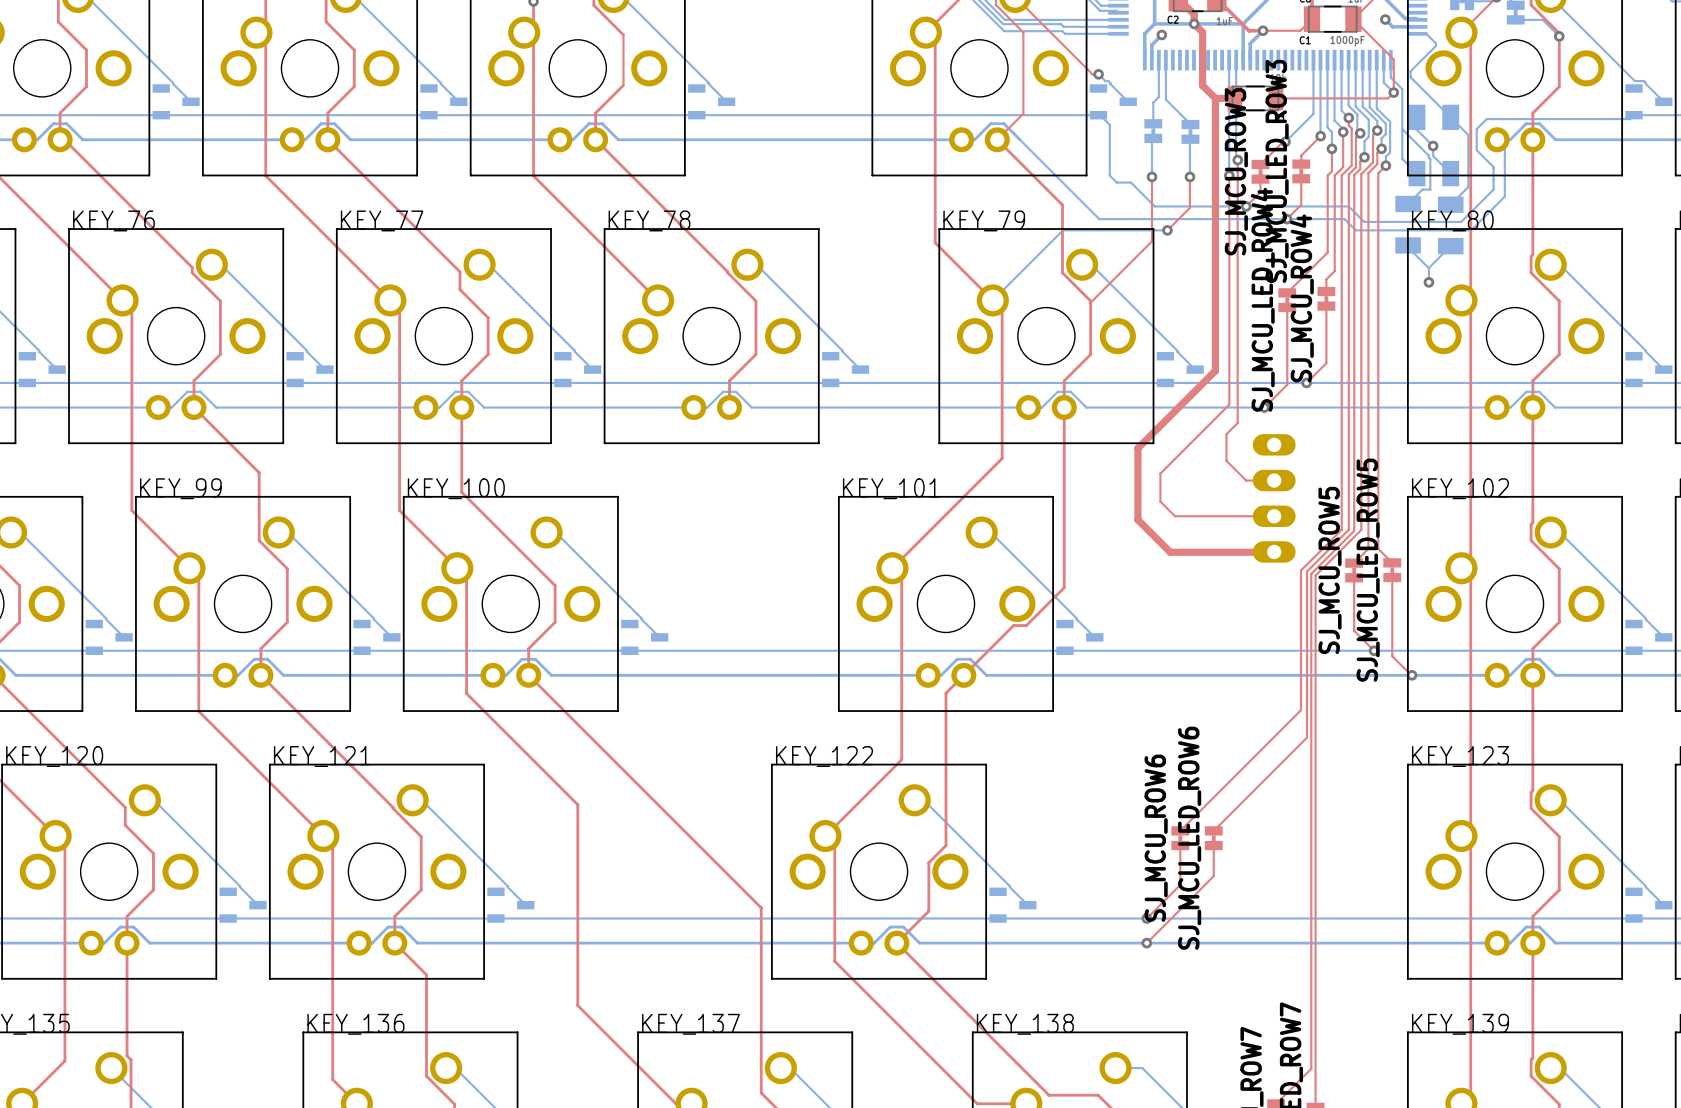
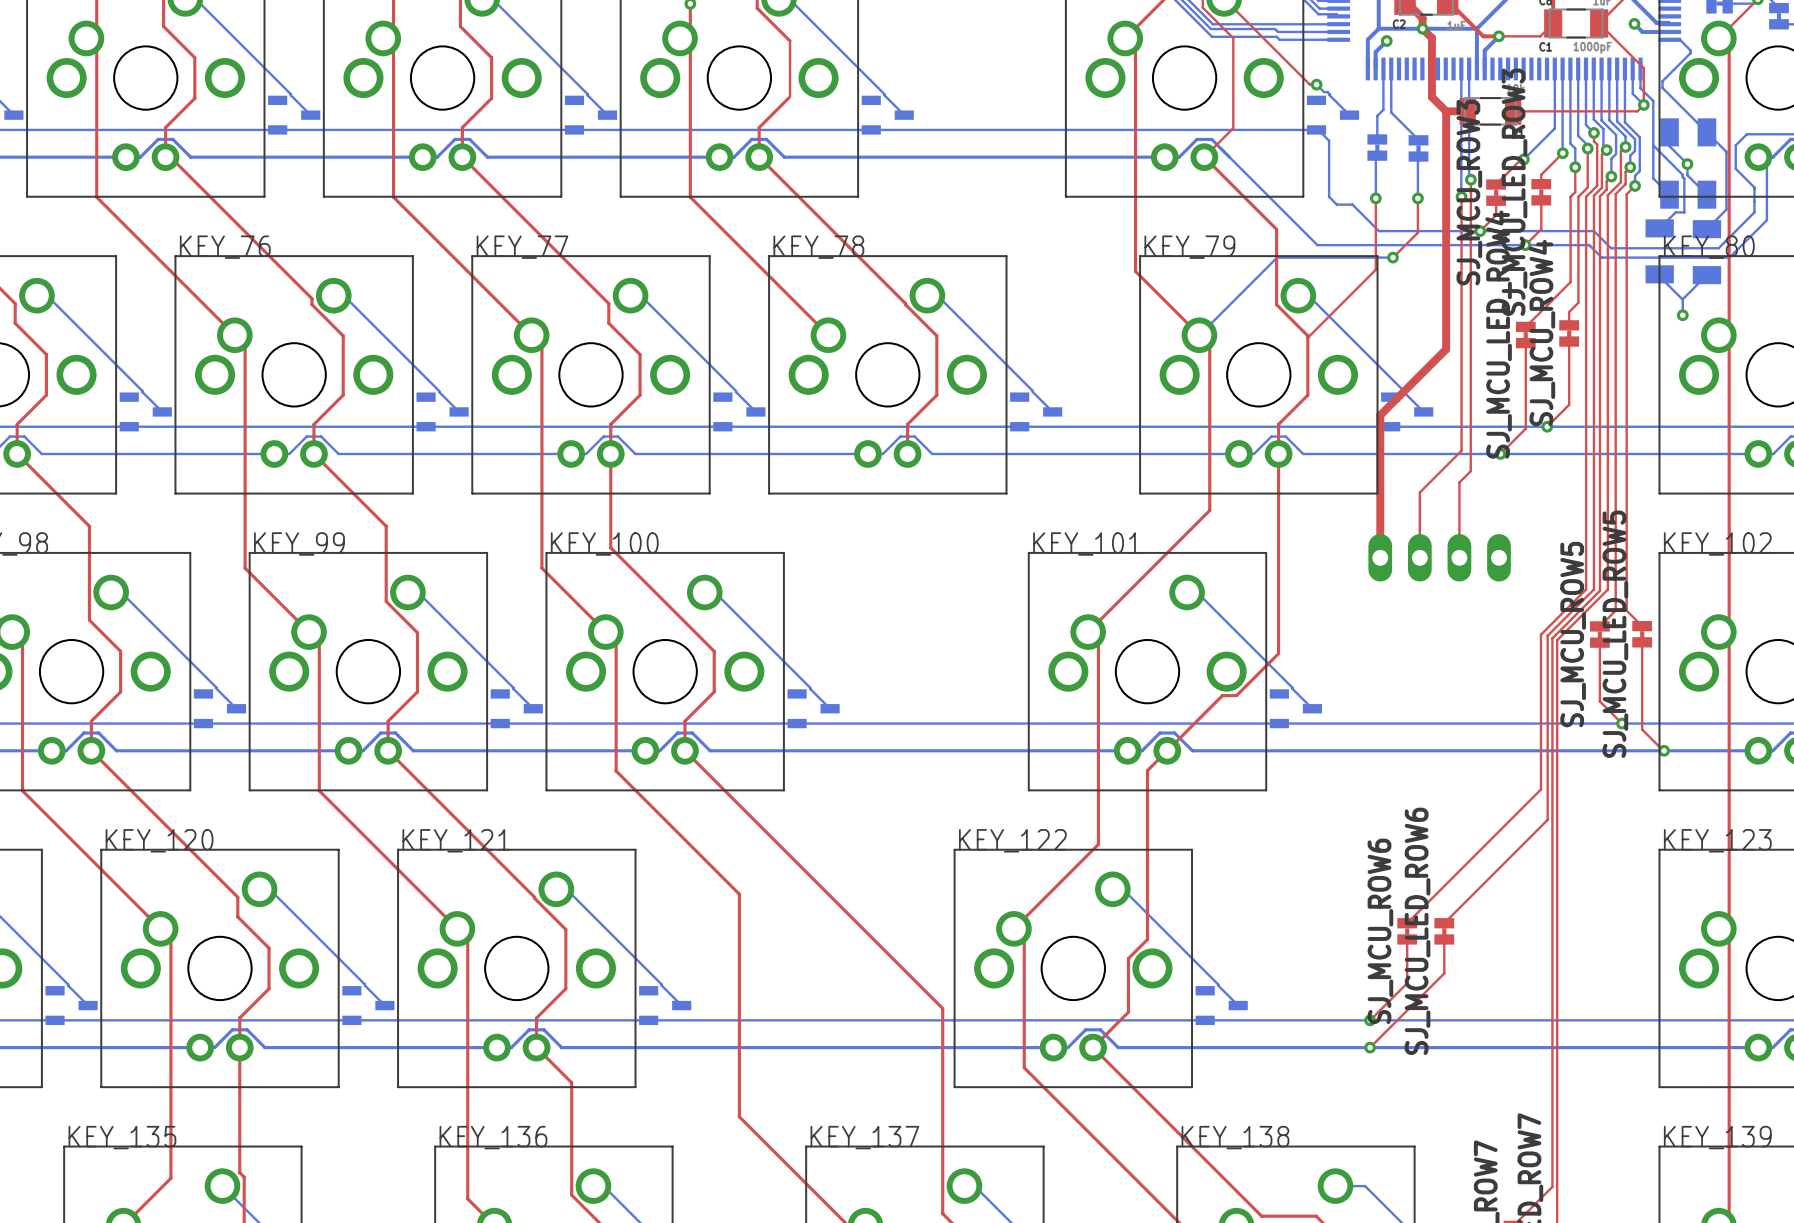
top track: (1215, 313) (1215, 370) (1137, 448) (1137, 519) (1170, 552) (1274, 551) -> (1446, 349) (1380, 415) (1380, 557)
top track: (1227, 433) (1226, 460) (1246, 480) (1274, 480) -> (1459, 482) (1459, 557)
top track: (1191, 442) (1160, 473) (1160, 501) (1175, 516) (1274, 516) -> (1419, 492) (1419, 557)
part rotation: 0° (1274, 498) -> 90° clockwise (1439, 557)

